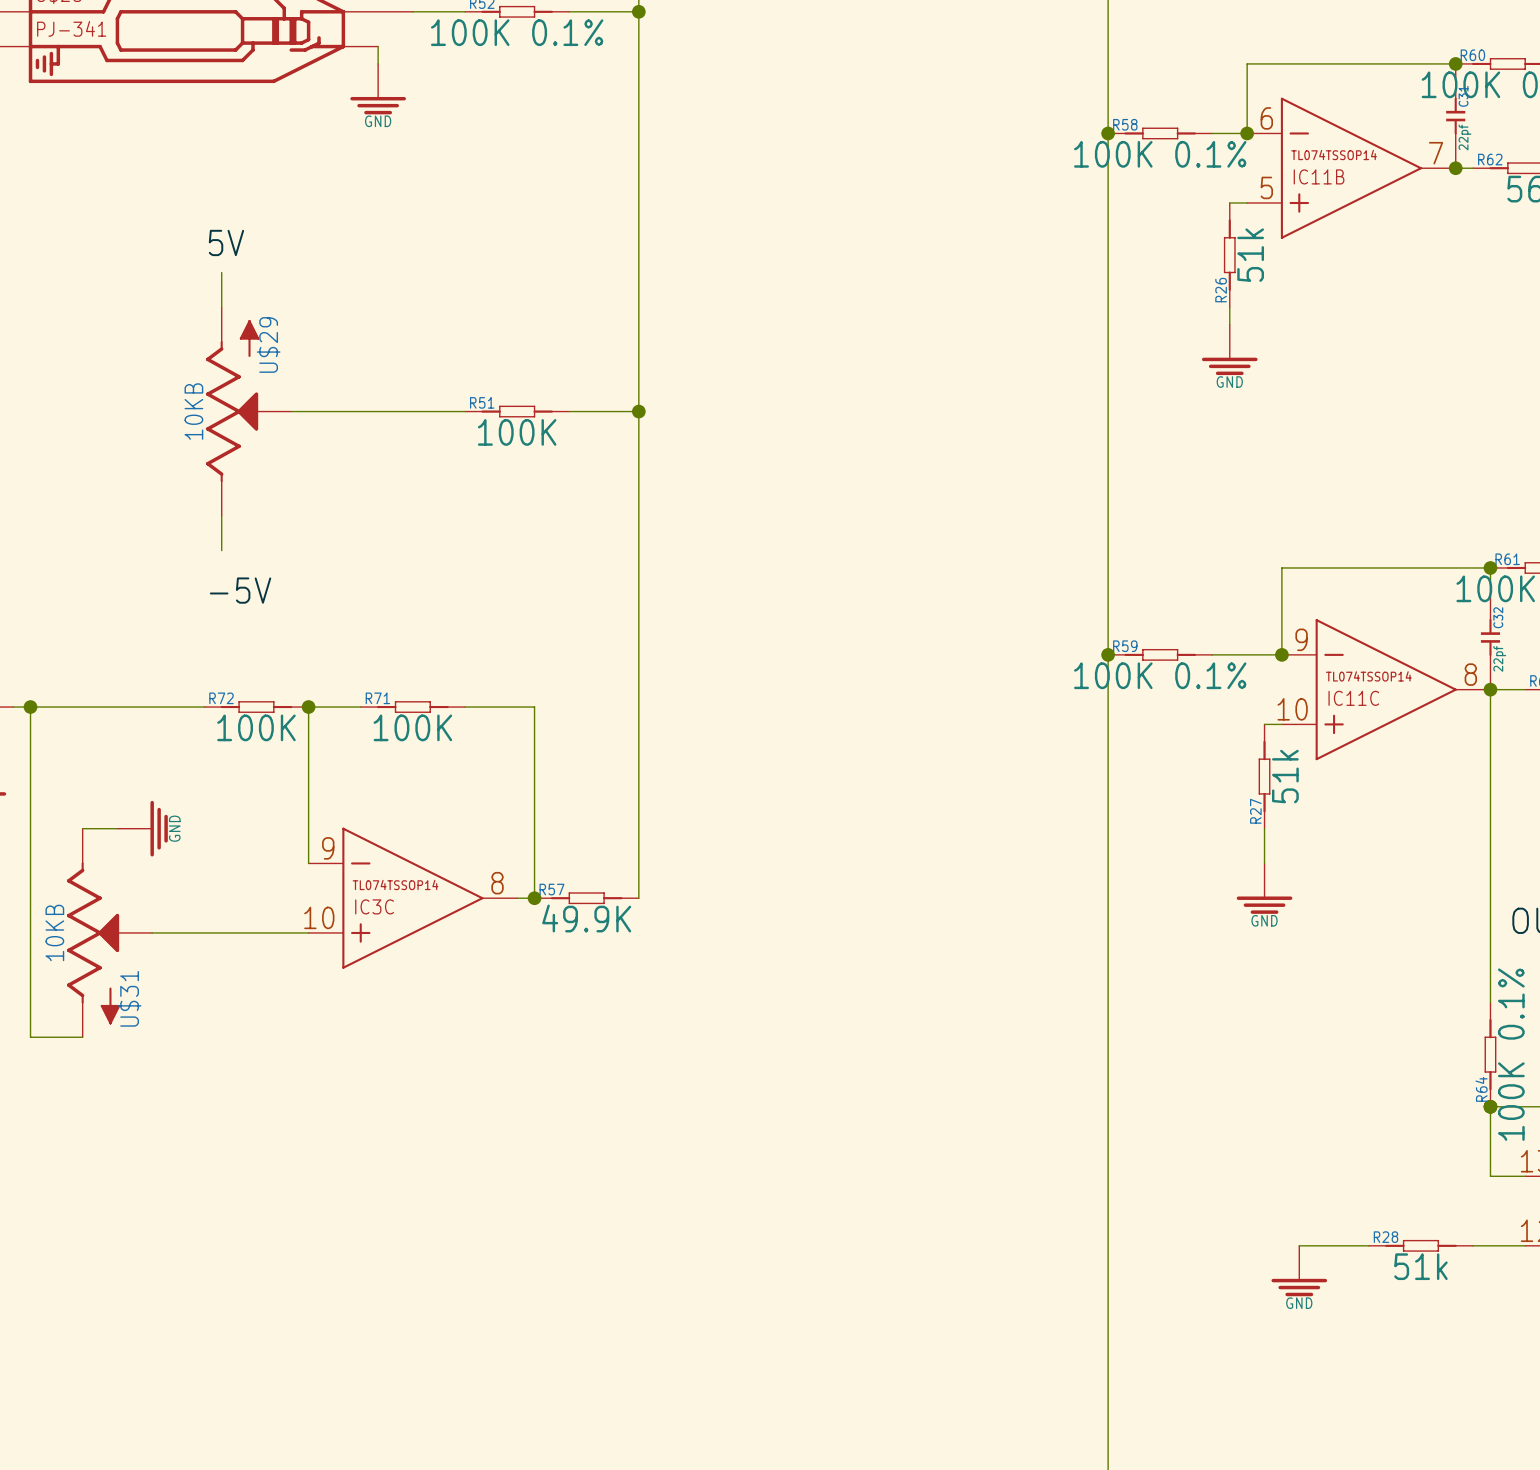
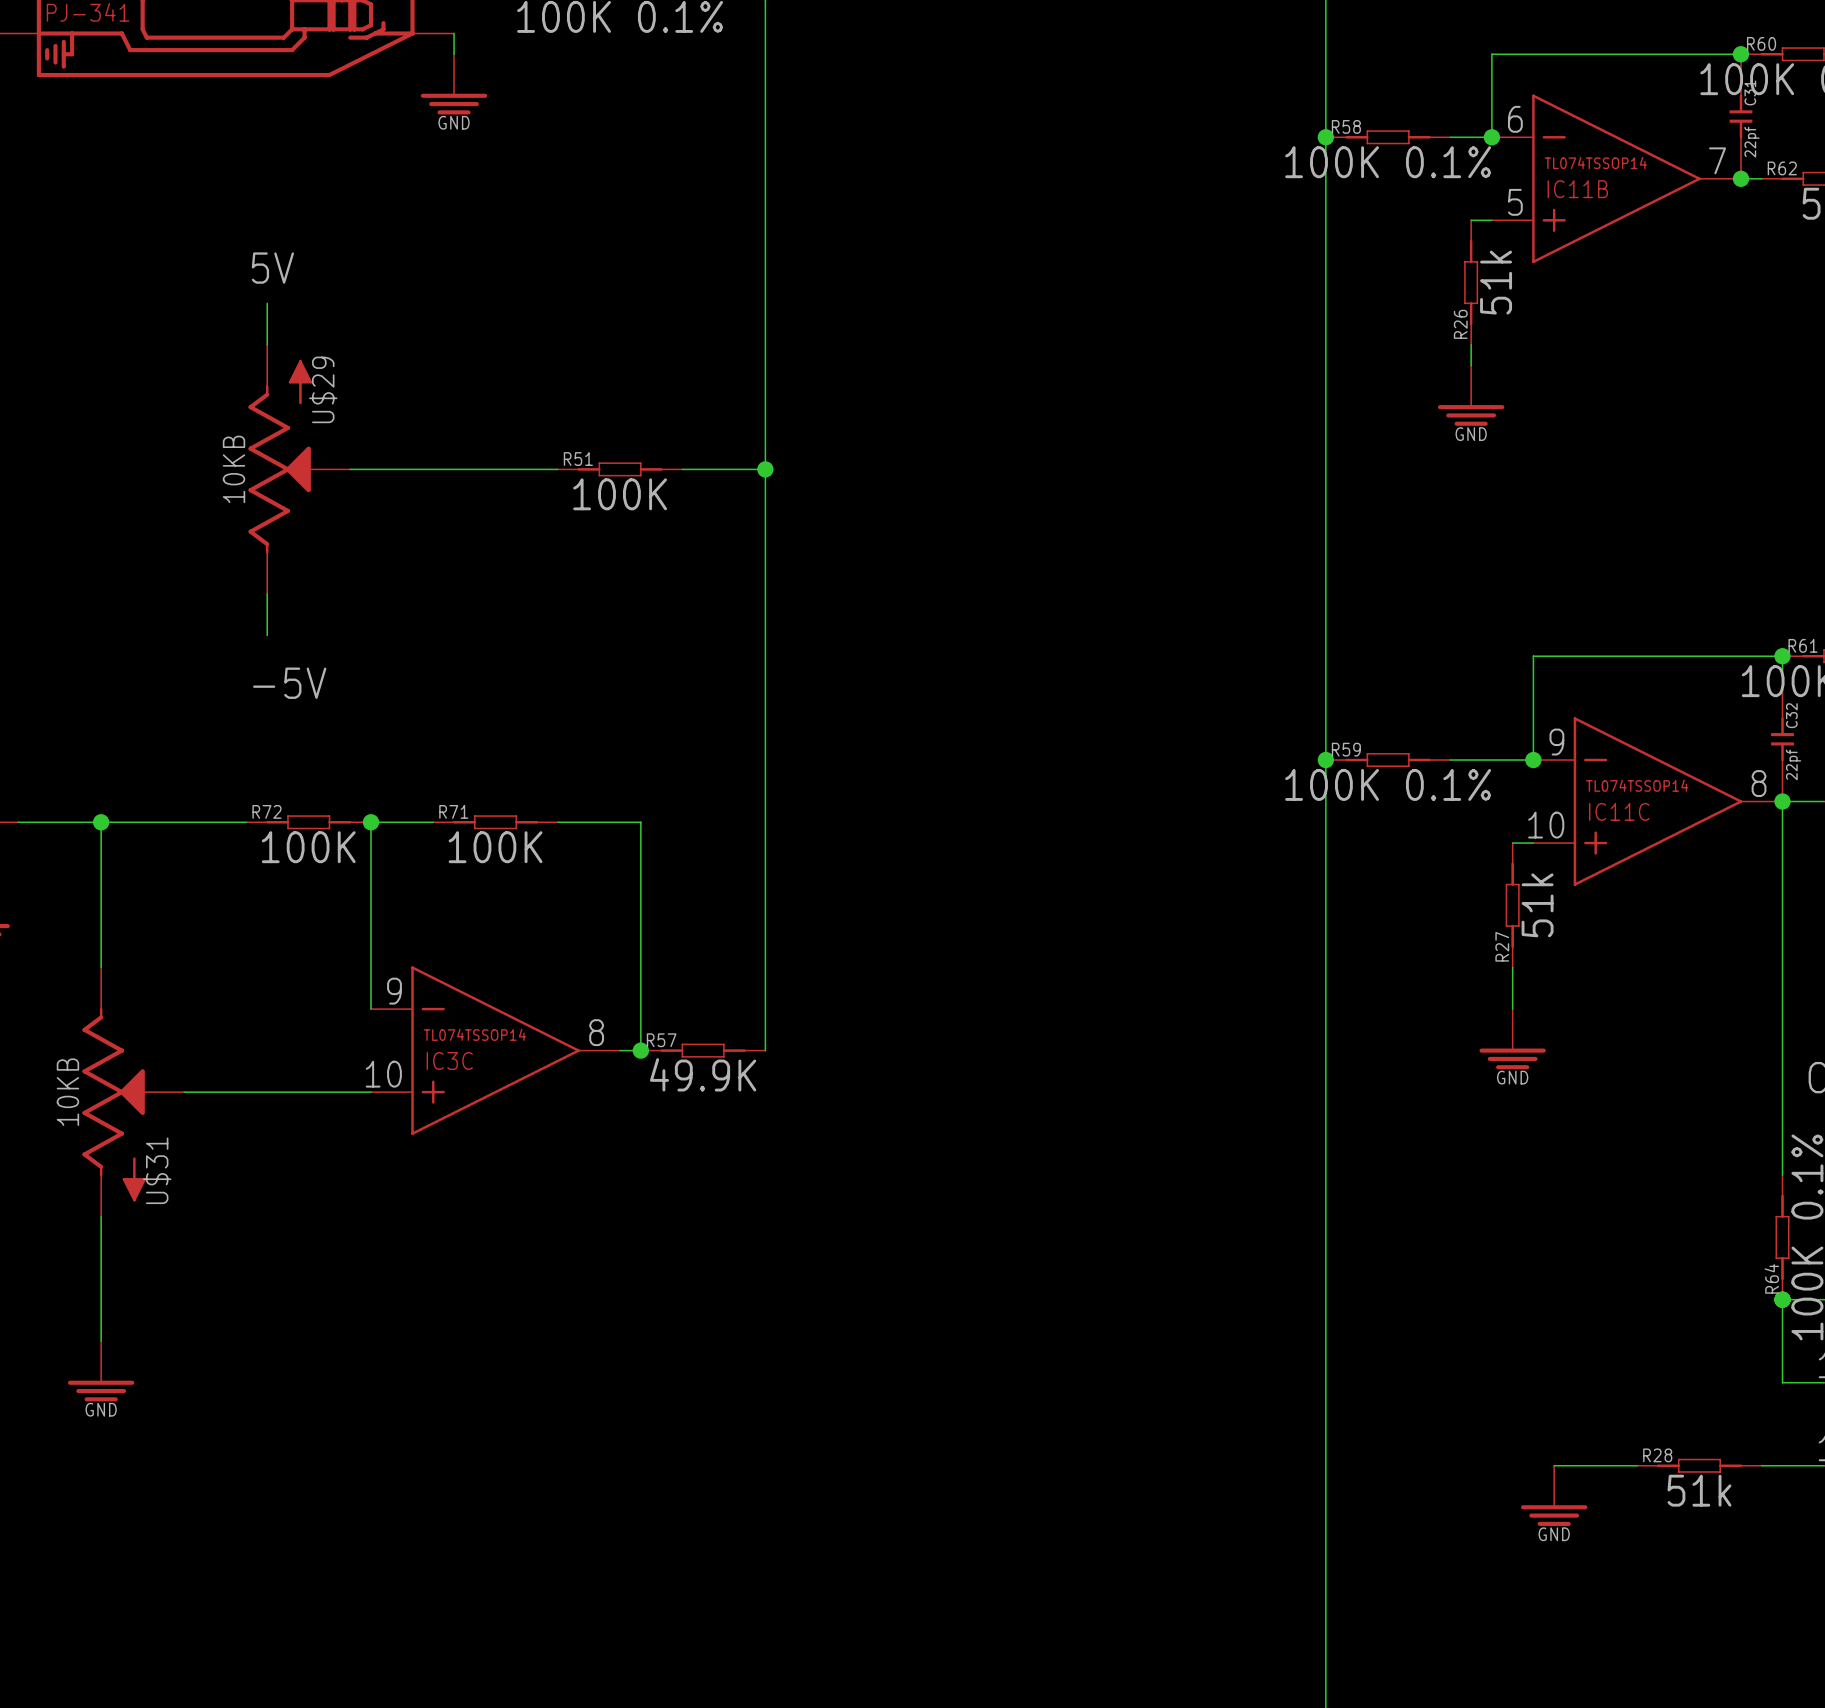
wire: (30, 707) (30, 1037) (82, 1037) -> (101, 1341) (101, 1216)
junction position: (30, 707) -> (101, 822)
wire: (82, 828) (117, 828) -> (101, 967) (101, 822)
power symbol: GND (142, 828) -> none
power symbol: none -> GND (101, 1371)

